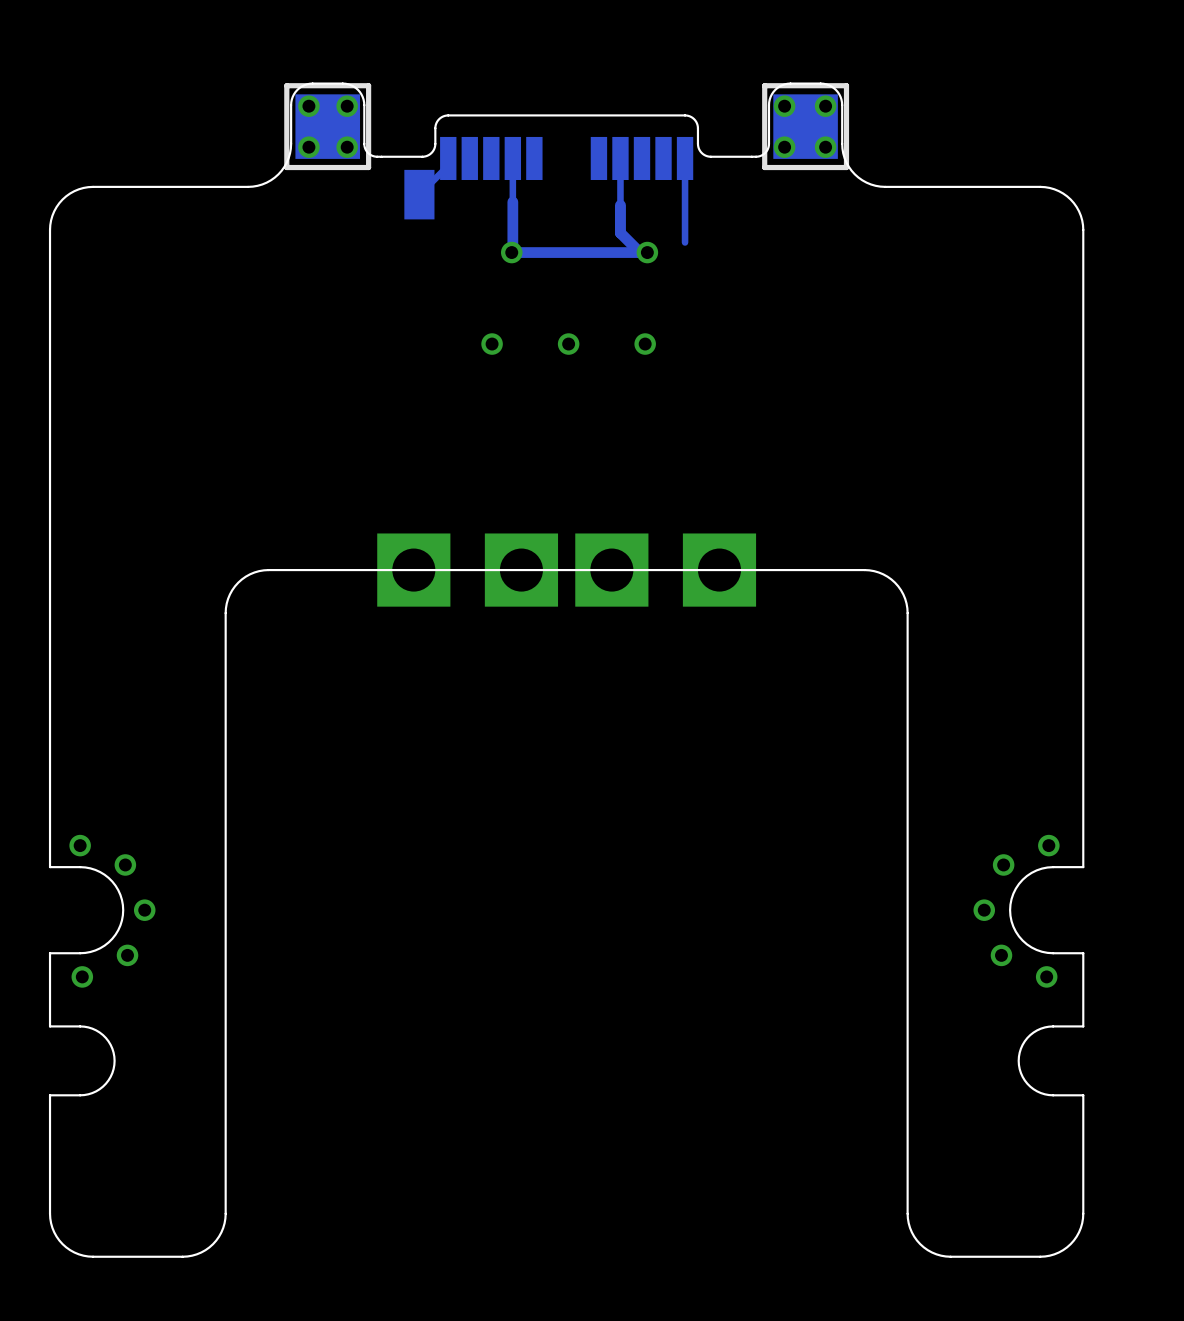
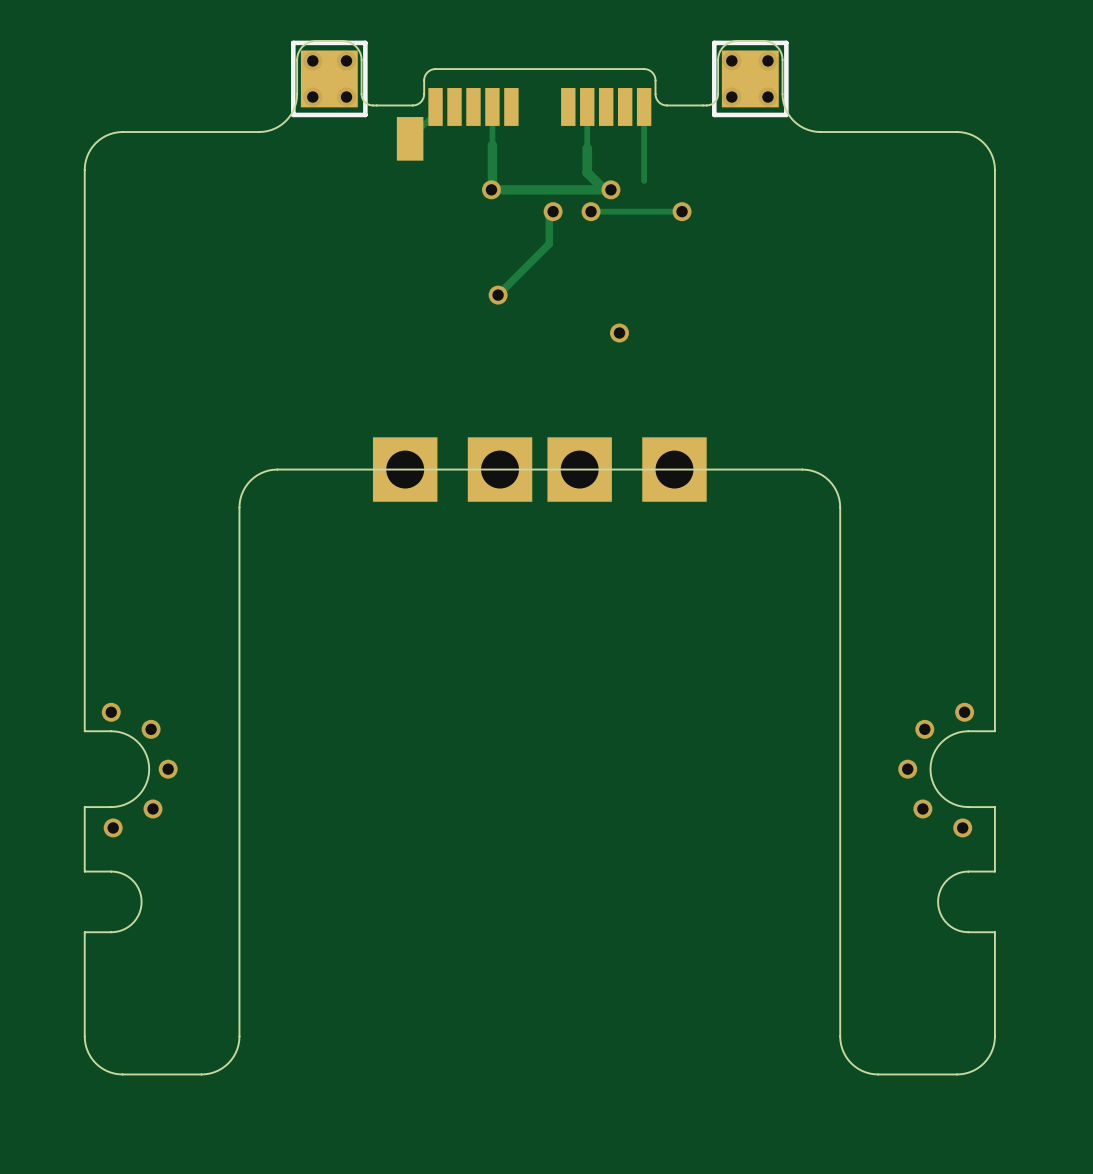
track: none -> (553, 211) (549, 215) (549, 243) (498, 295)
via: none -> (553, 211)
via: none -> (591, 211)
track: none -> (682, 211) (591, 211)
via: none -> (682, 211)
via: (492, 344) -> none
via: (568, 344) -> none
via: (645, 344) -> none
via: none -> (498, 295)
via: none -> (619, 333)

